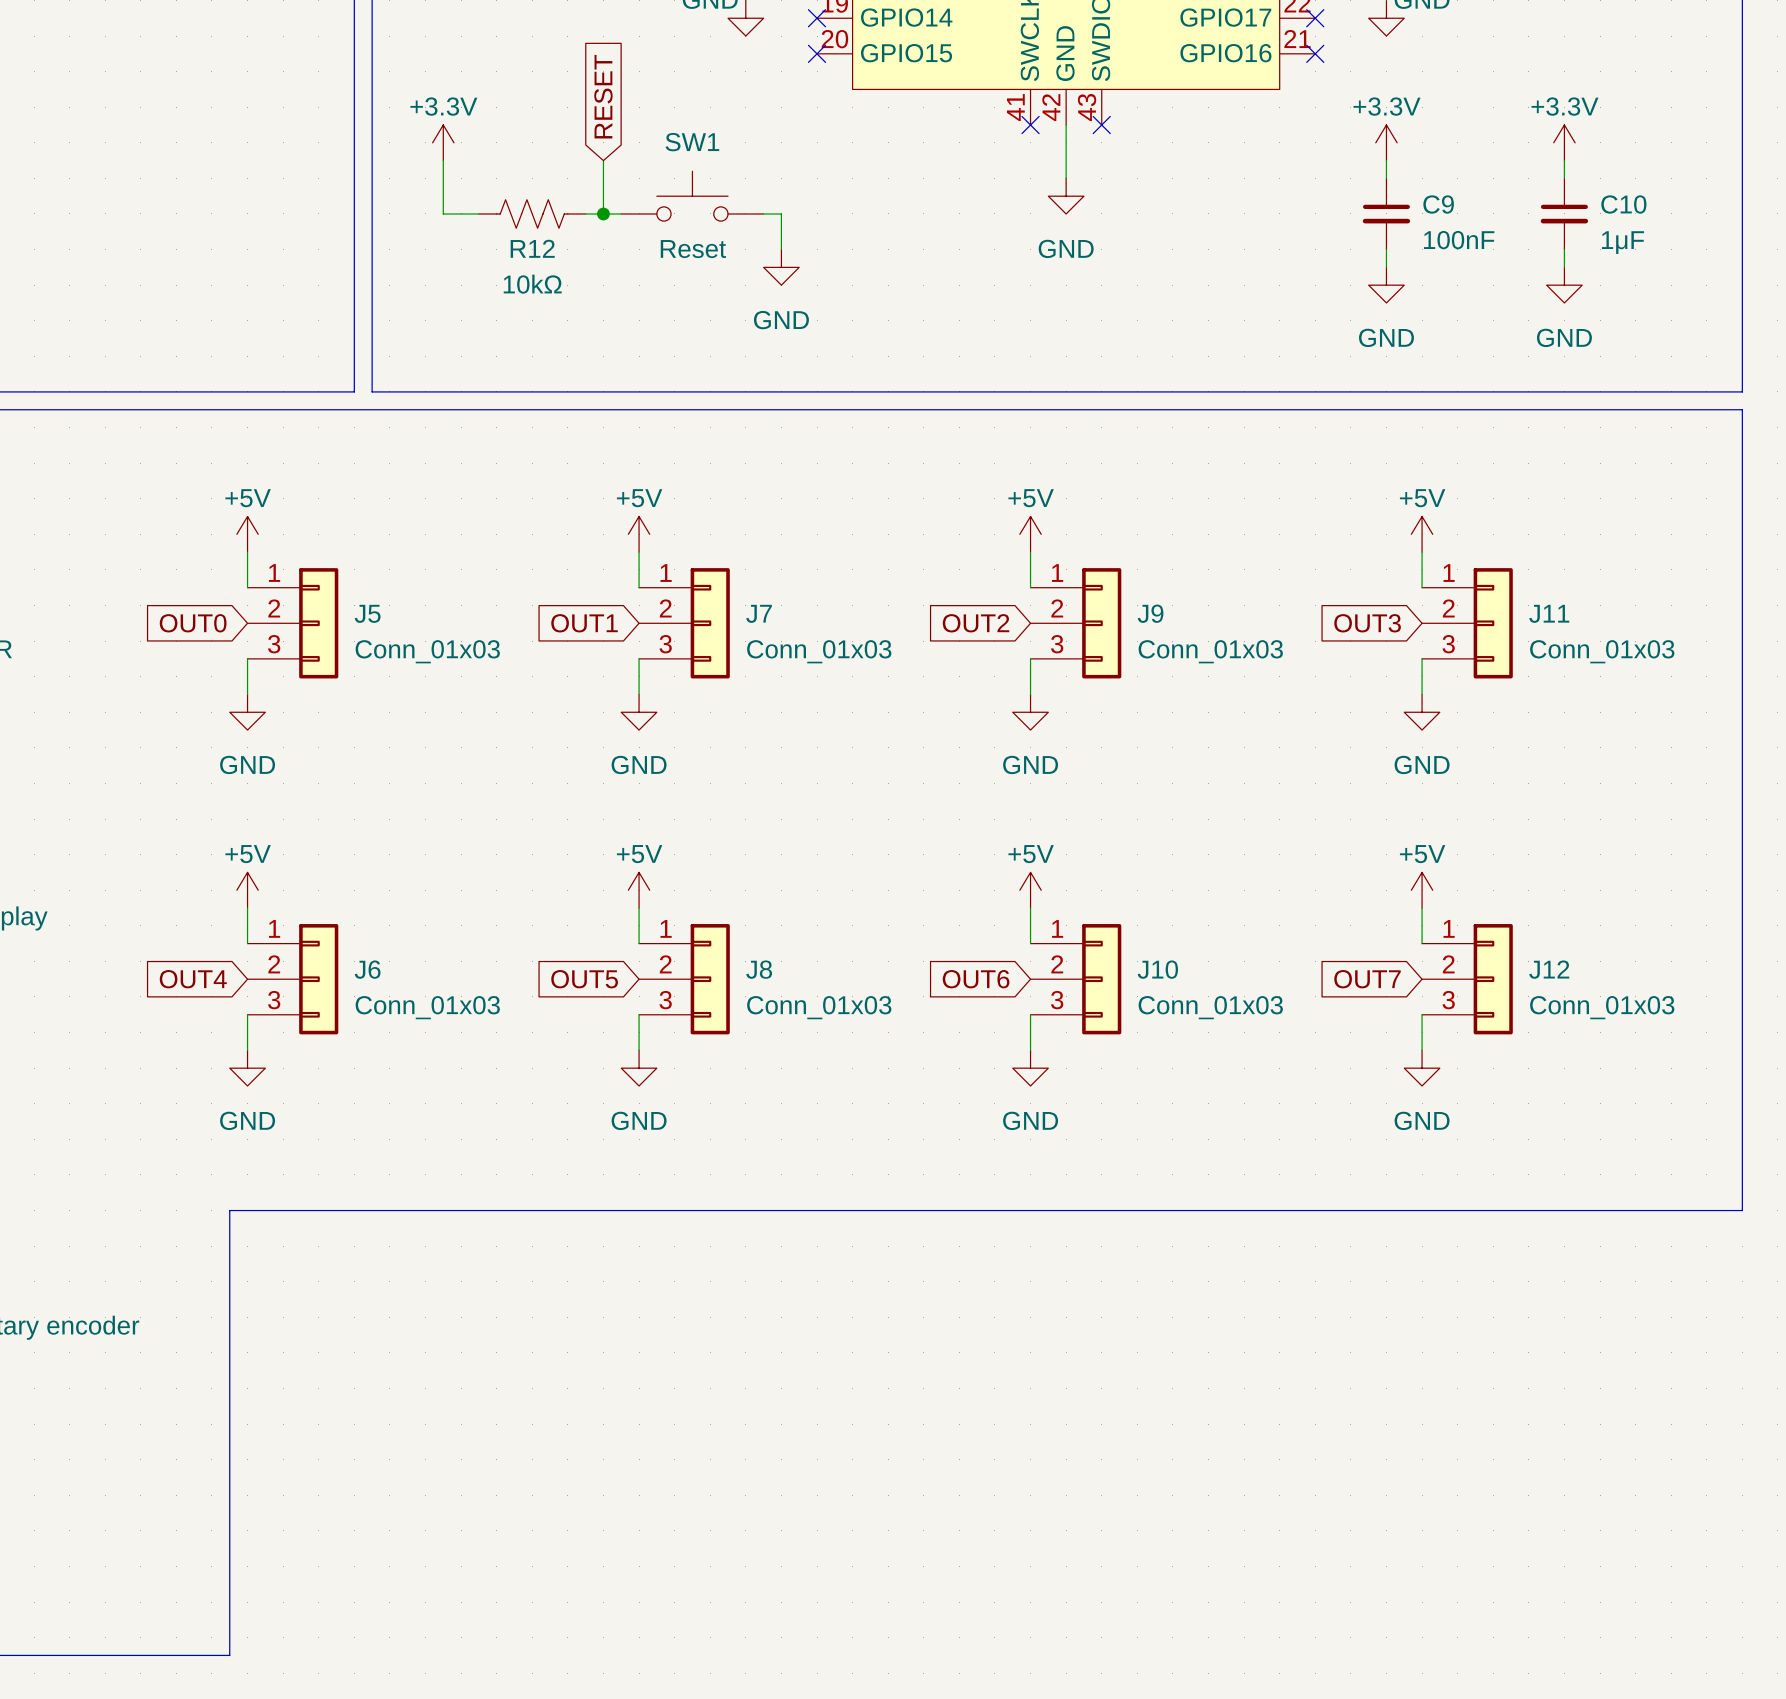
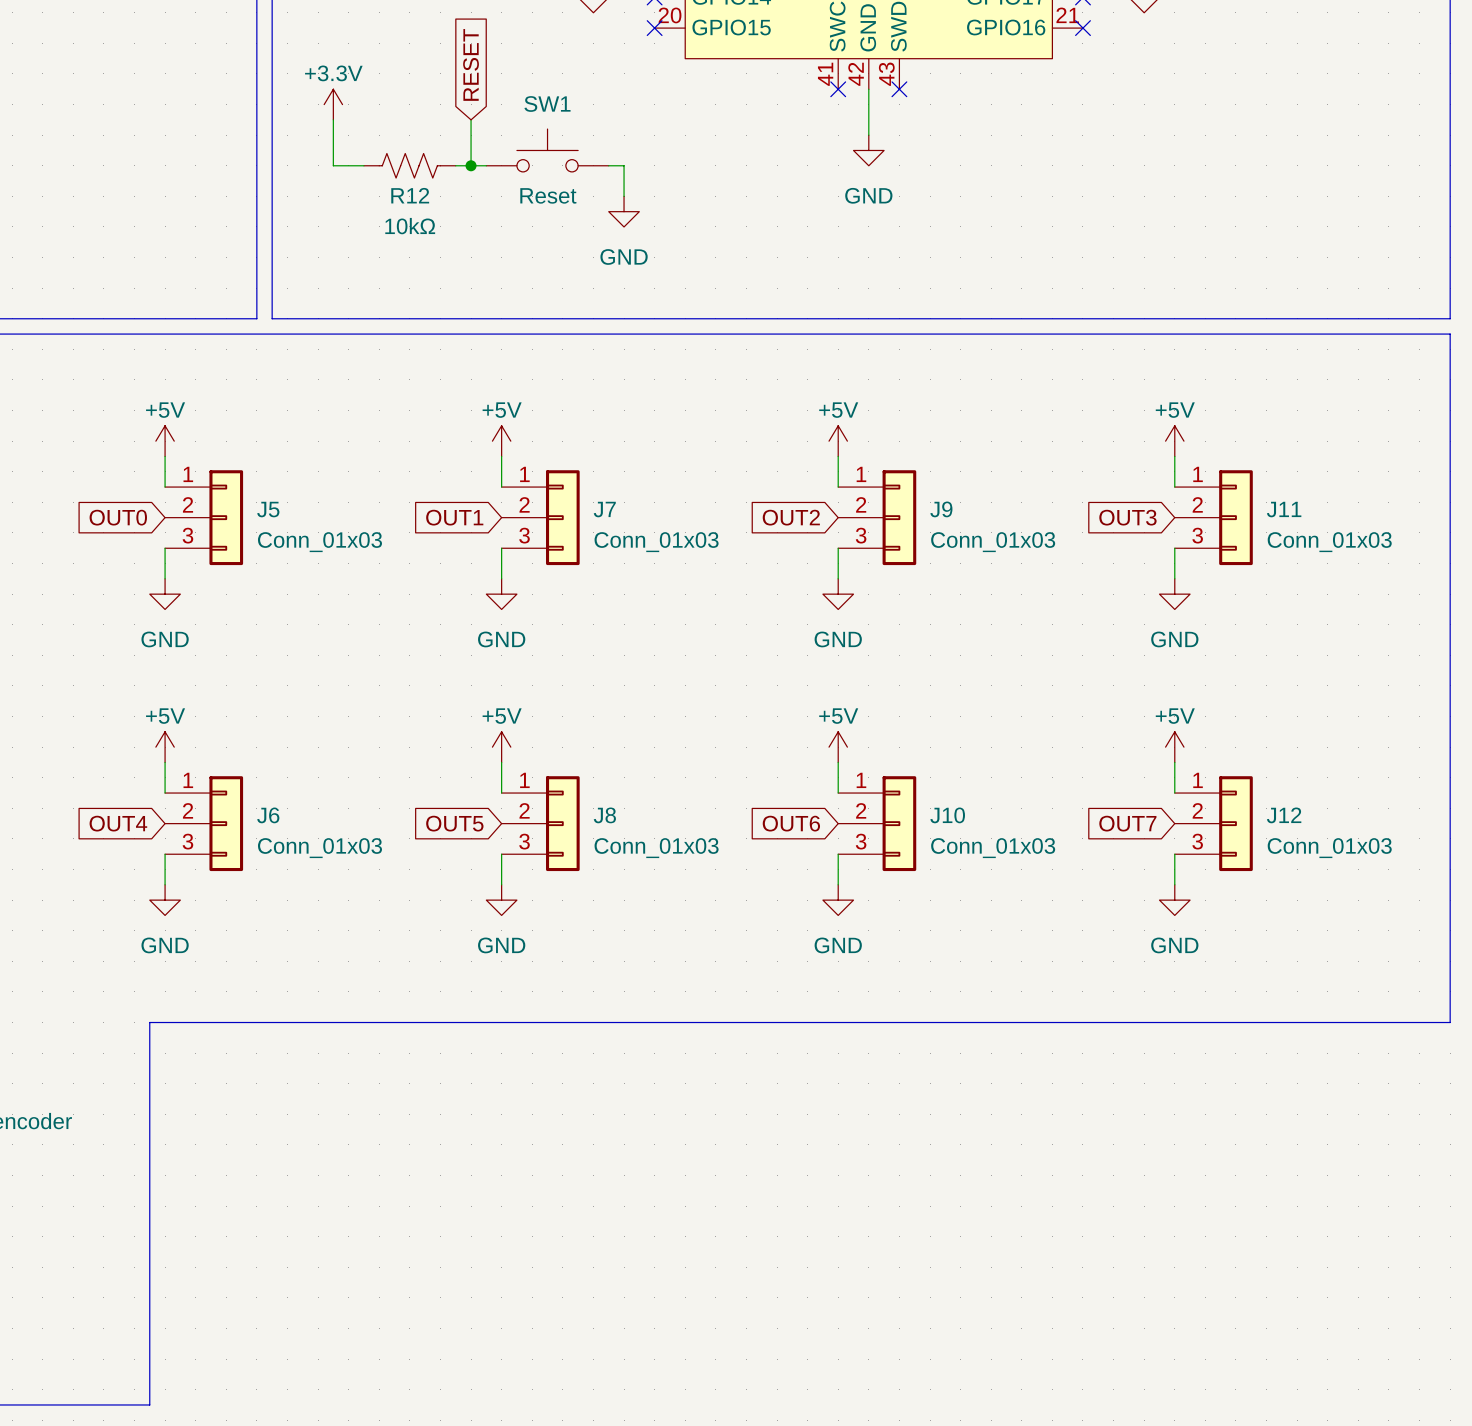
power symbol: +3.3V (1386, 142) -> none
power symbol: +3.3V (1564, 142) -> none
wire: (1386, 160) (1386, 178) -> none
wire: (1564, 160) (1564, 178) -> none
C9: 100nF (1386, 213) -> none
C10: 1μF (1564, 213) -> none
wire: (1386, 249) (1386, 267) -> none
wire: (1564, 249) (1564, 267) -> none
power symbol: GND (1386, 285) -> none
power symbol: GND (1564, 285) -> none

